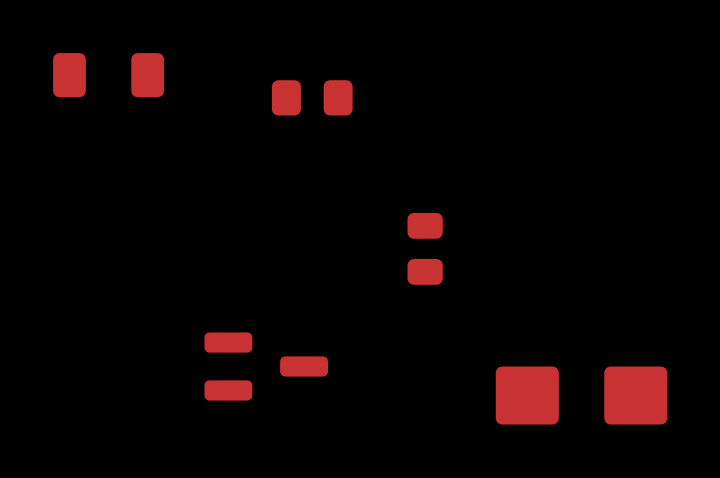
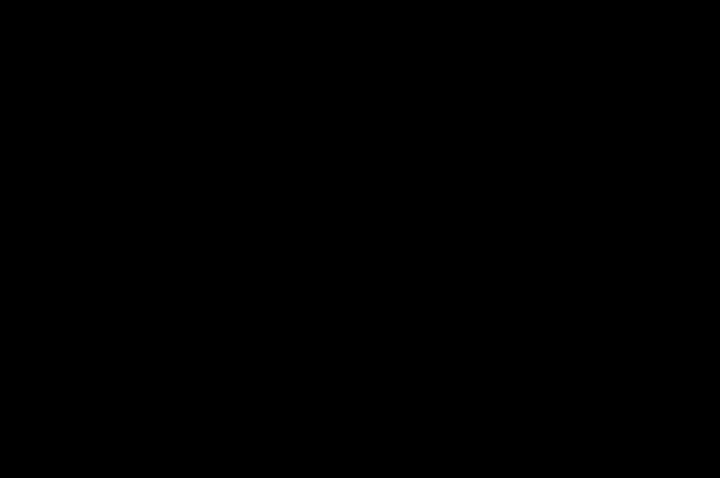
part: (108, 75) -> none
part: (312, 97) -> none
part: (425, 248) -> none
part: (266, 366) -> none
part: (581, 395) -> none

